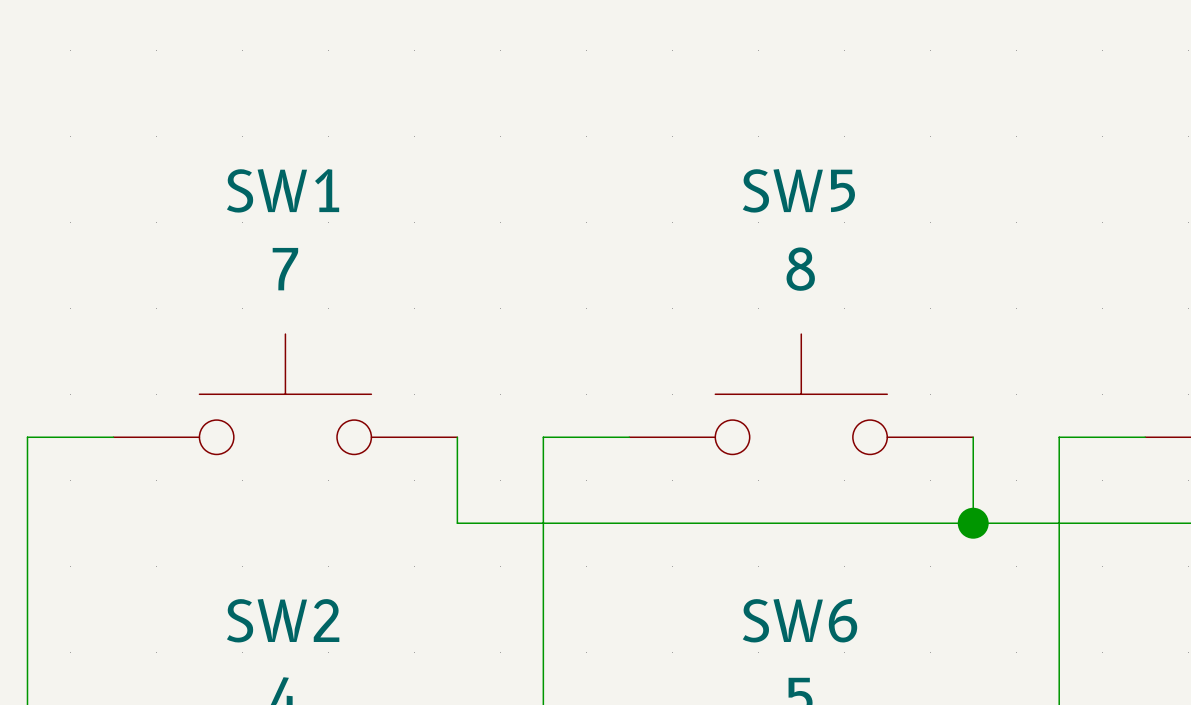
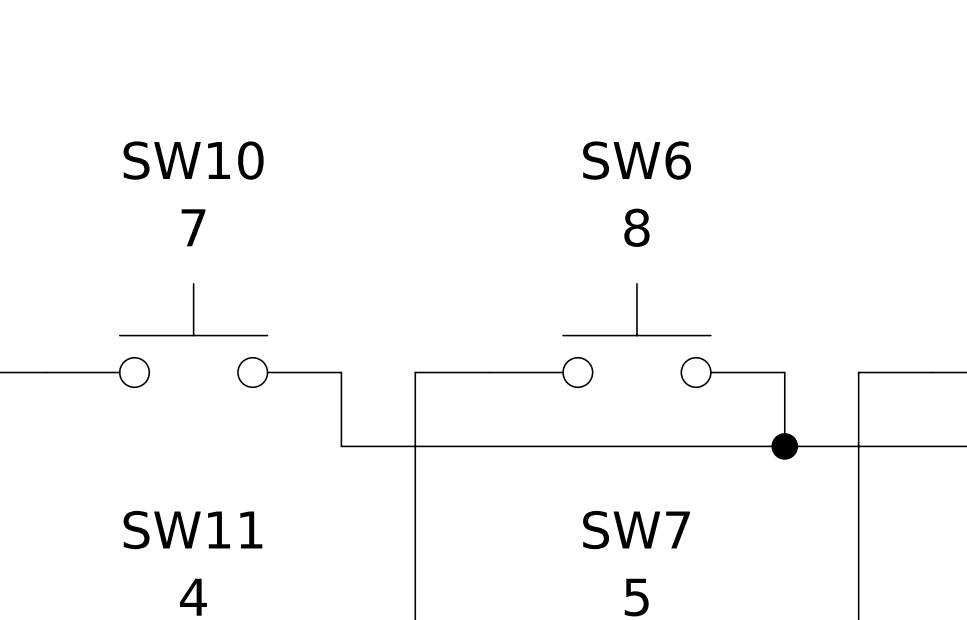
SW1 name: SW1 (283, 190) -> SW10 (193, 160)
SW5 name: SW5 (798, 190) -> SW6 (637, 160)
SW2 name: SW2 (283, 620) -> SW11 (192, 530)
SW6 name: SW6 (799, 620) -> SW7 (636, 530)

